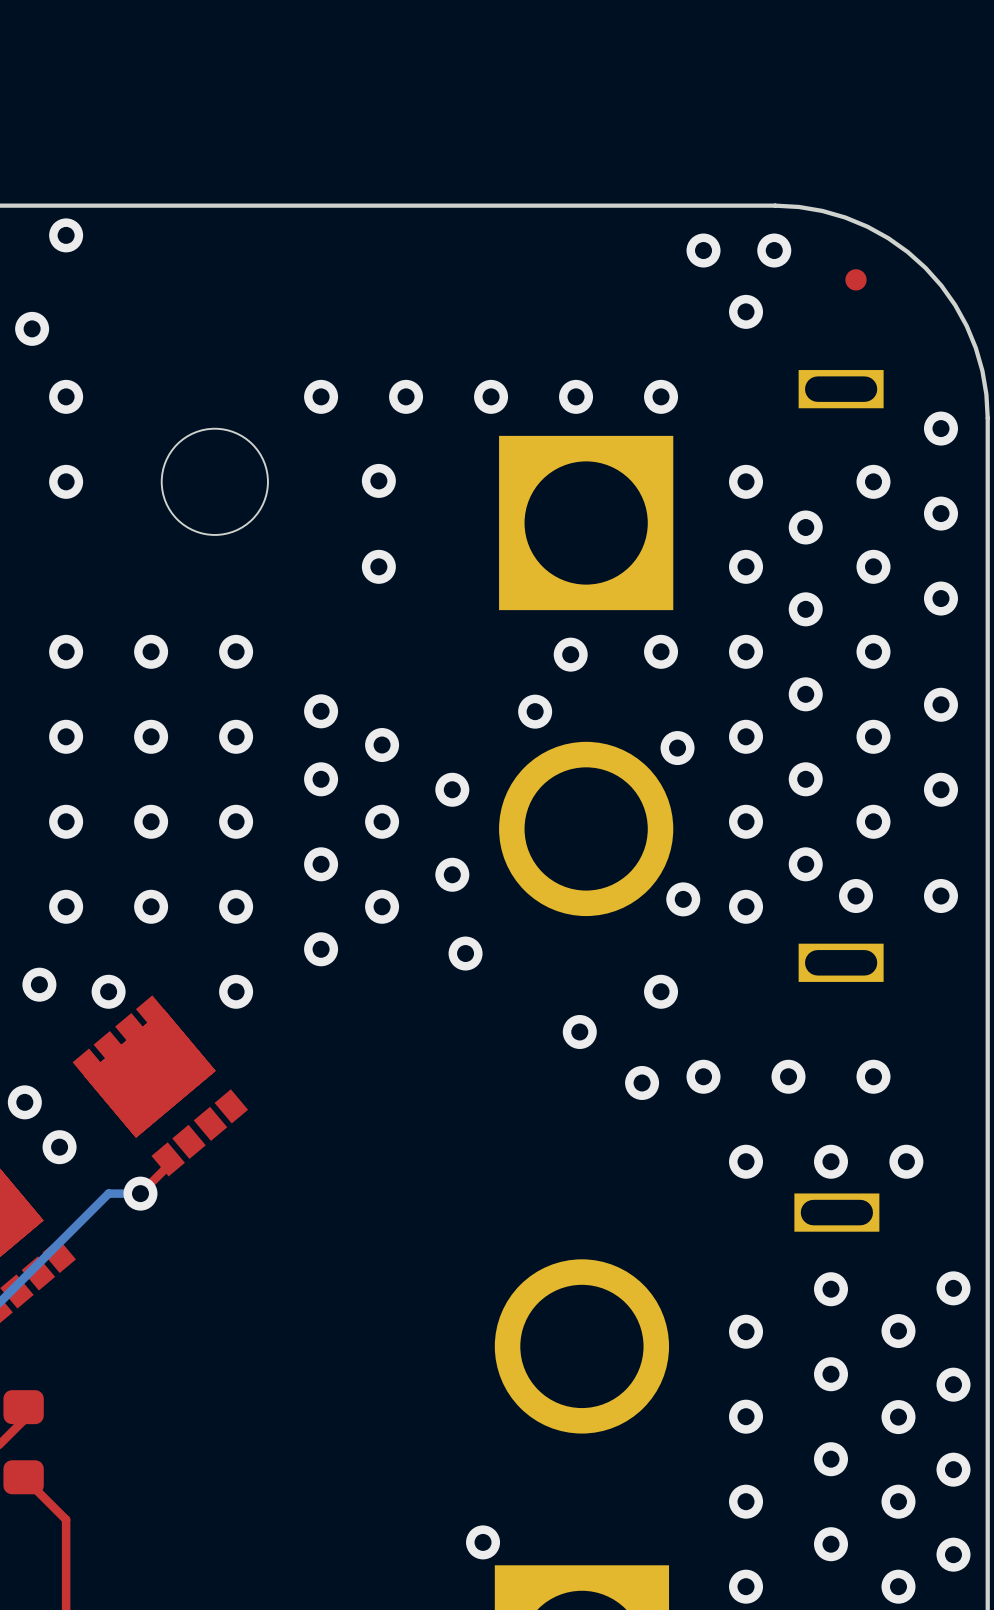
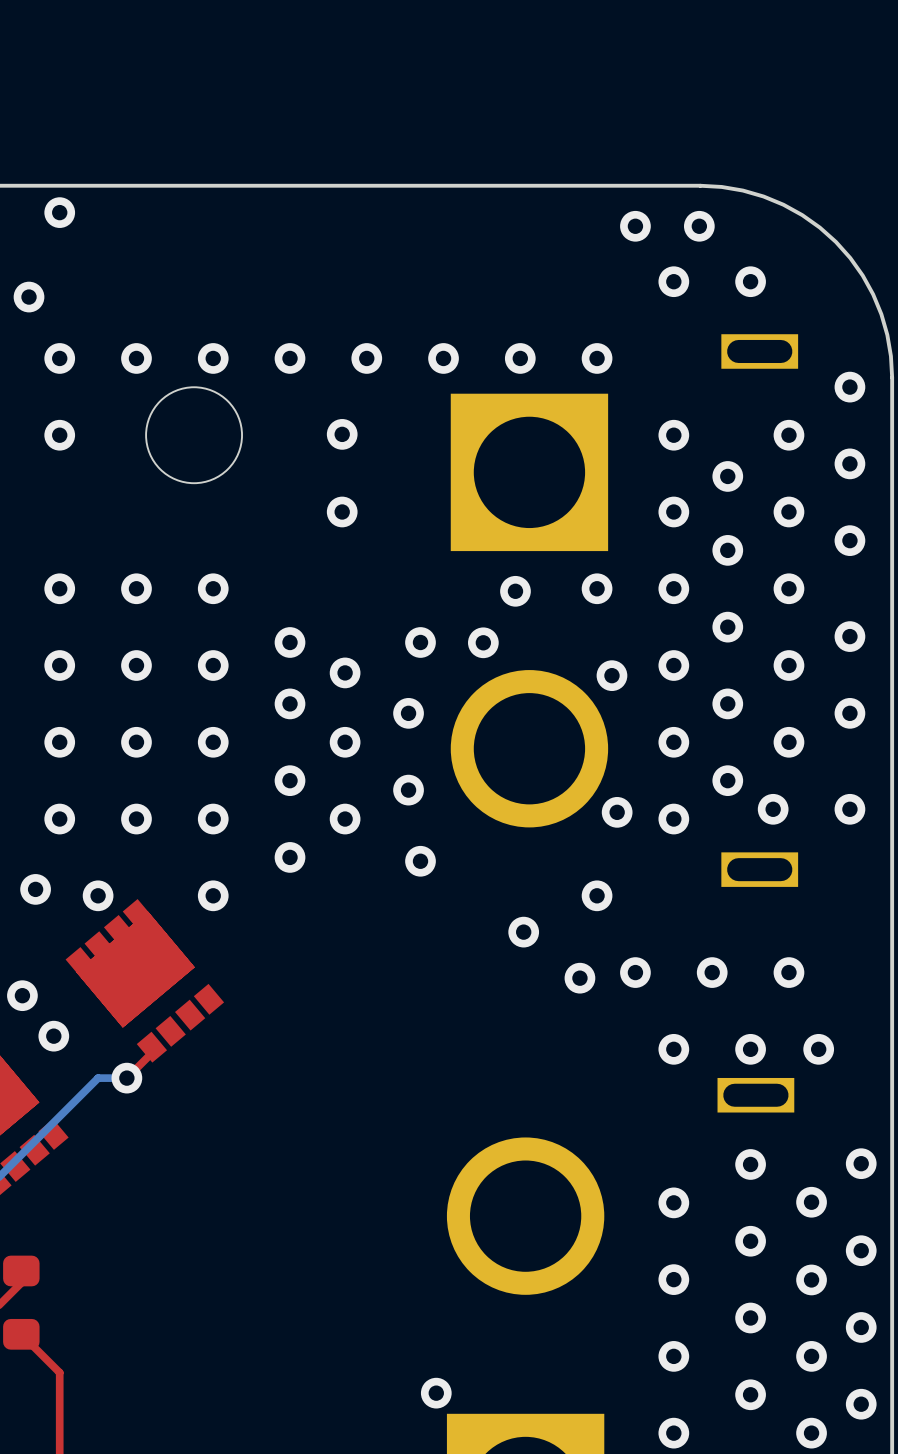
part: (856, 279) -> none
via: none -> (750, 281)
via: none -> (136, 358)
via: none -> (213, 358)
via: none -> (420, 642)

